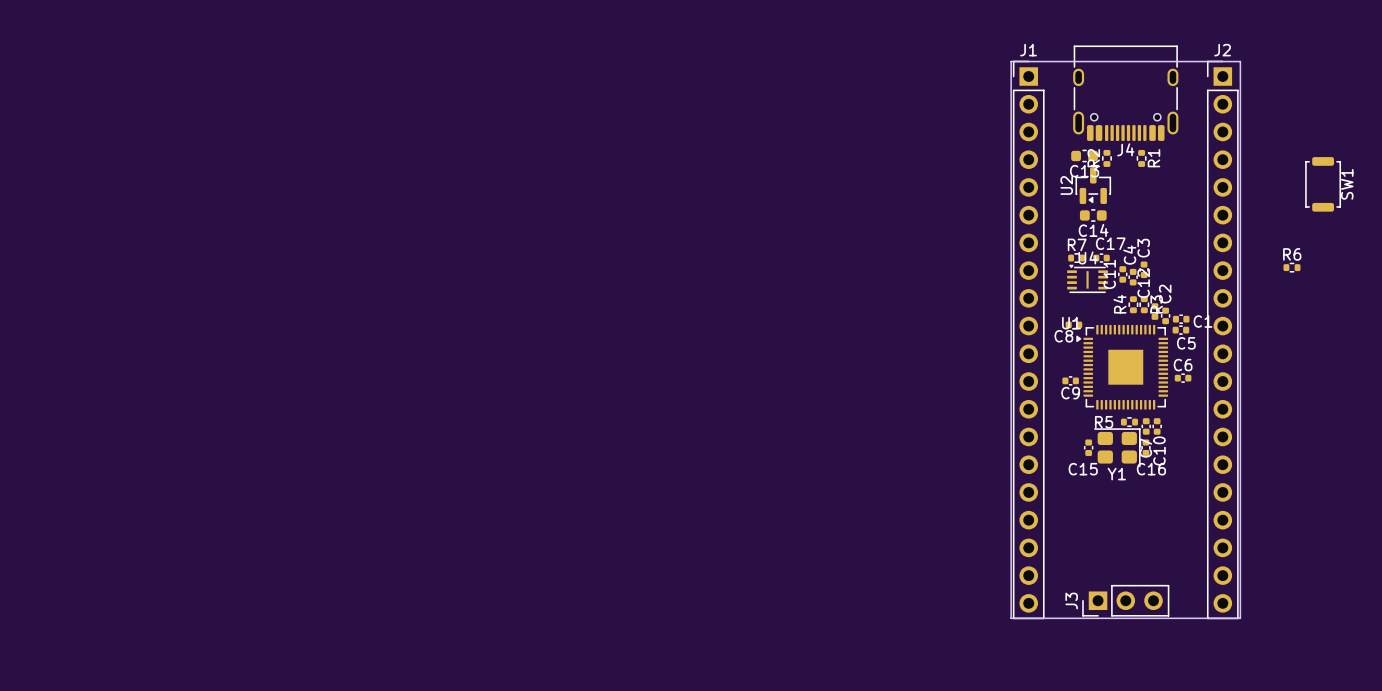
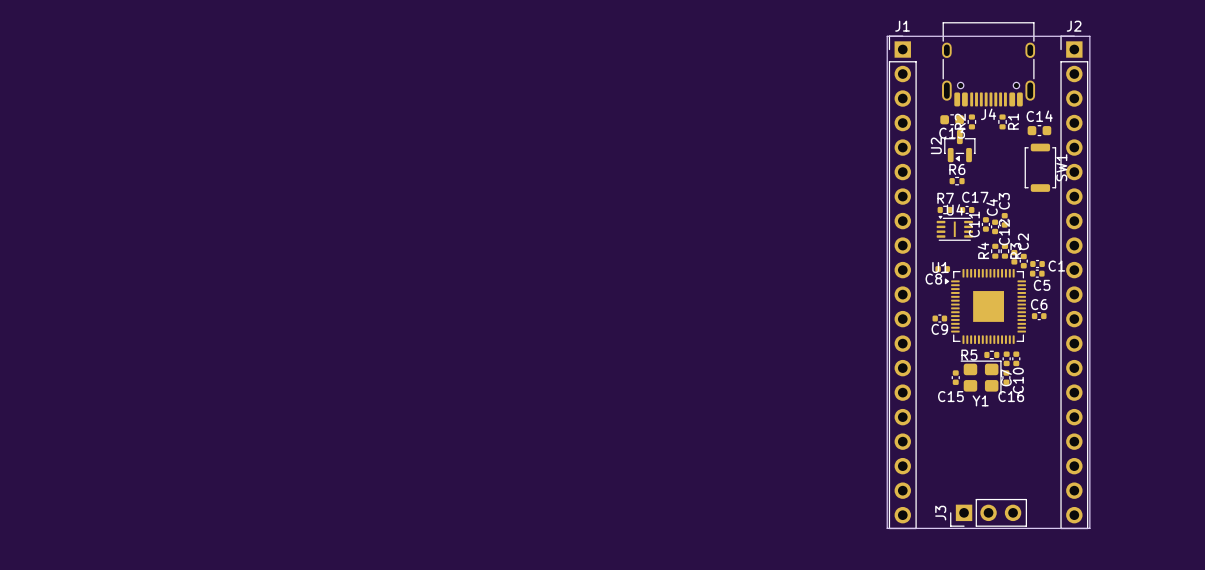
SW1 position: (1323, 184) -> (1040, 167)
C14 position: (1093, 215) -> (1039, 130)
C14 name position: C14 (1093, 230) -> C14 (1039, 116)
R6 position: (1291, 267) -> (957, 181)

